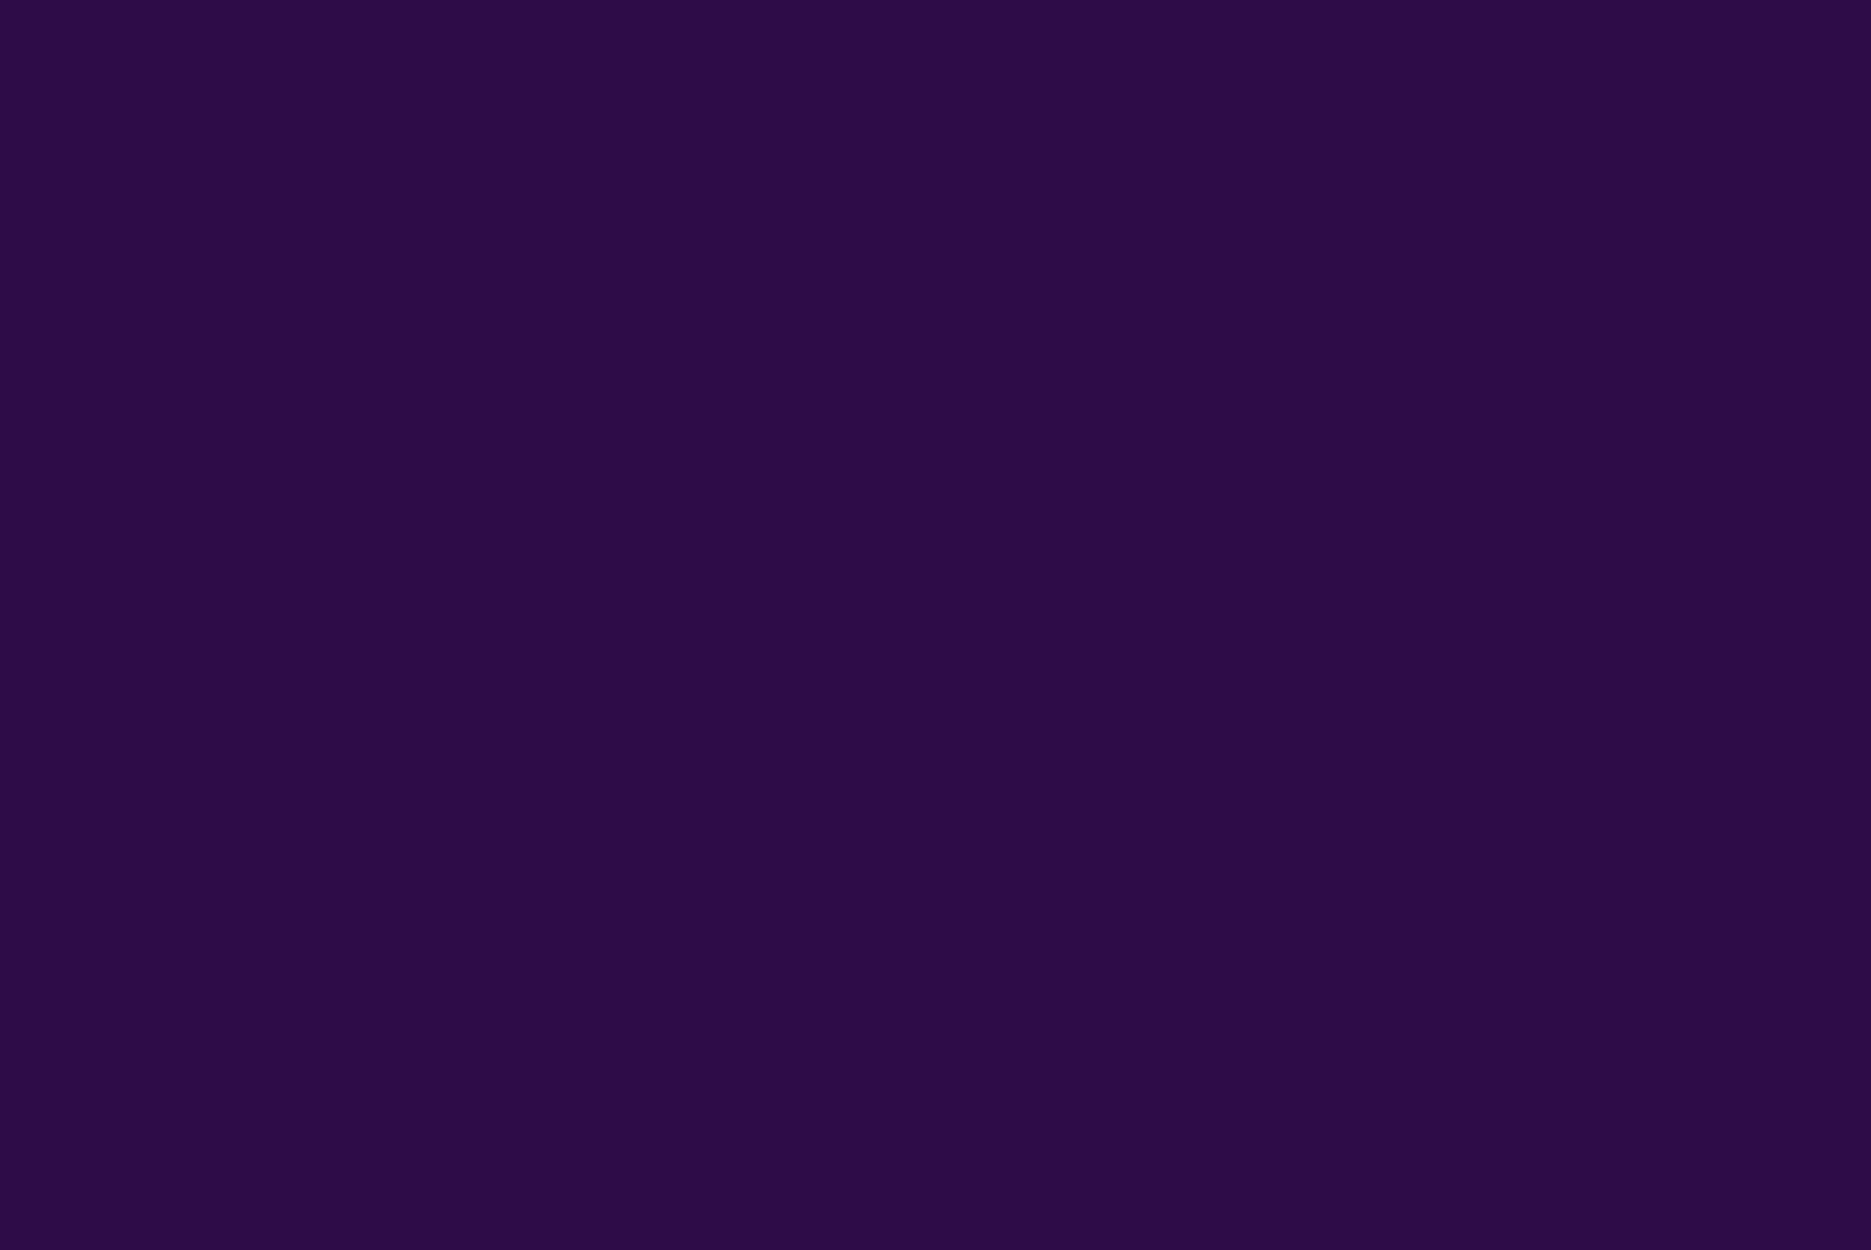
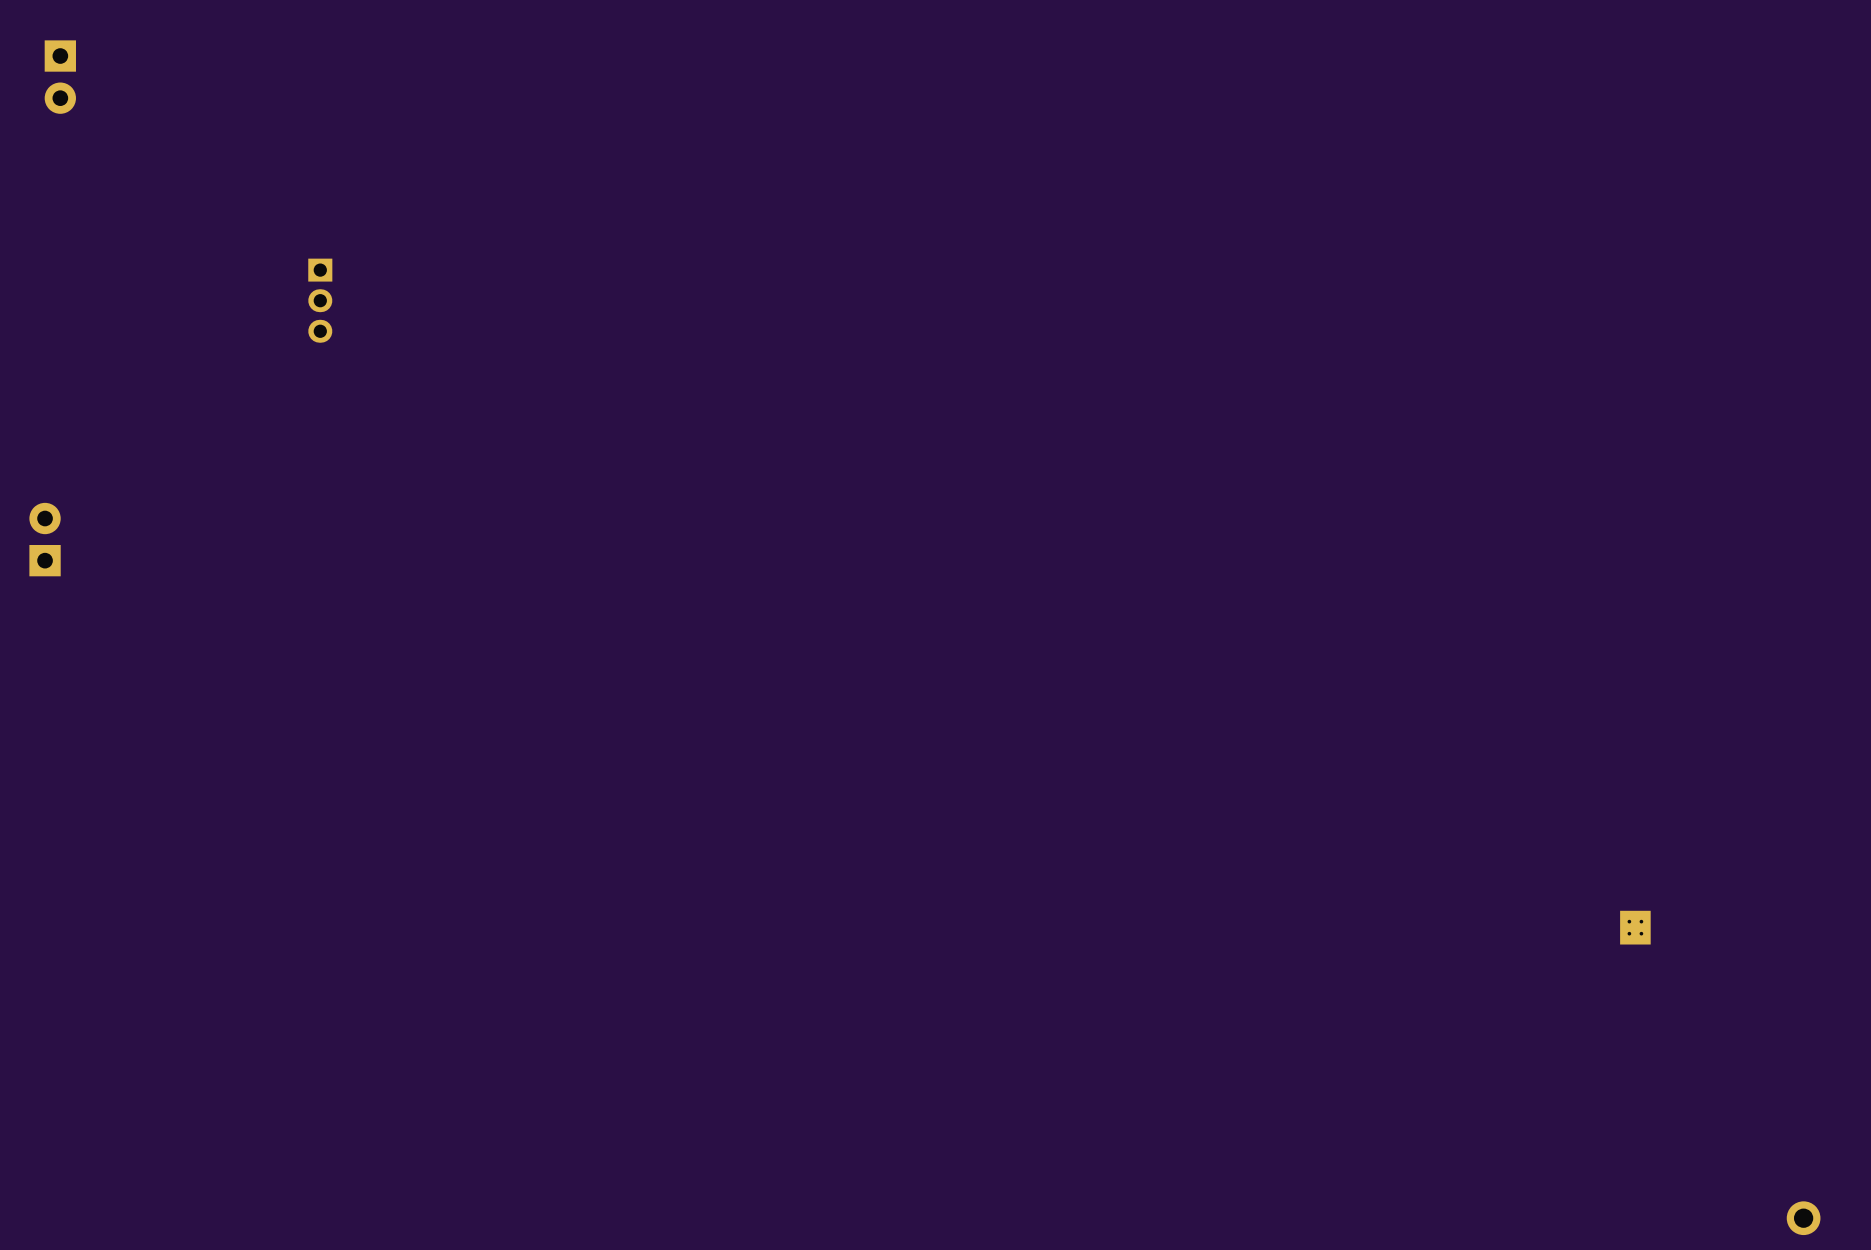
part: none -> (60, 77)
part: none -> (320, 300)
part: none -> (45, 539)
part: none -> (1635, 927)
part: none -> (1803, 1218)

